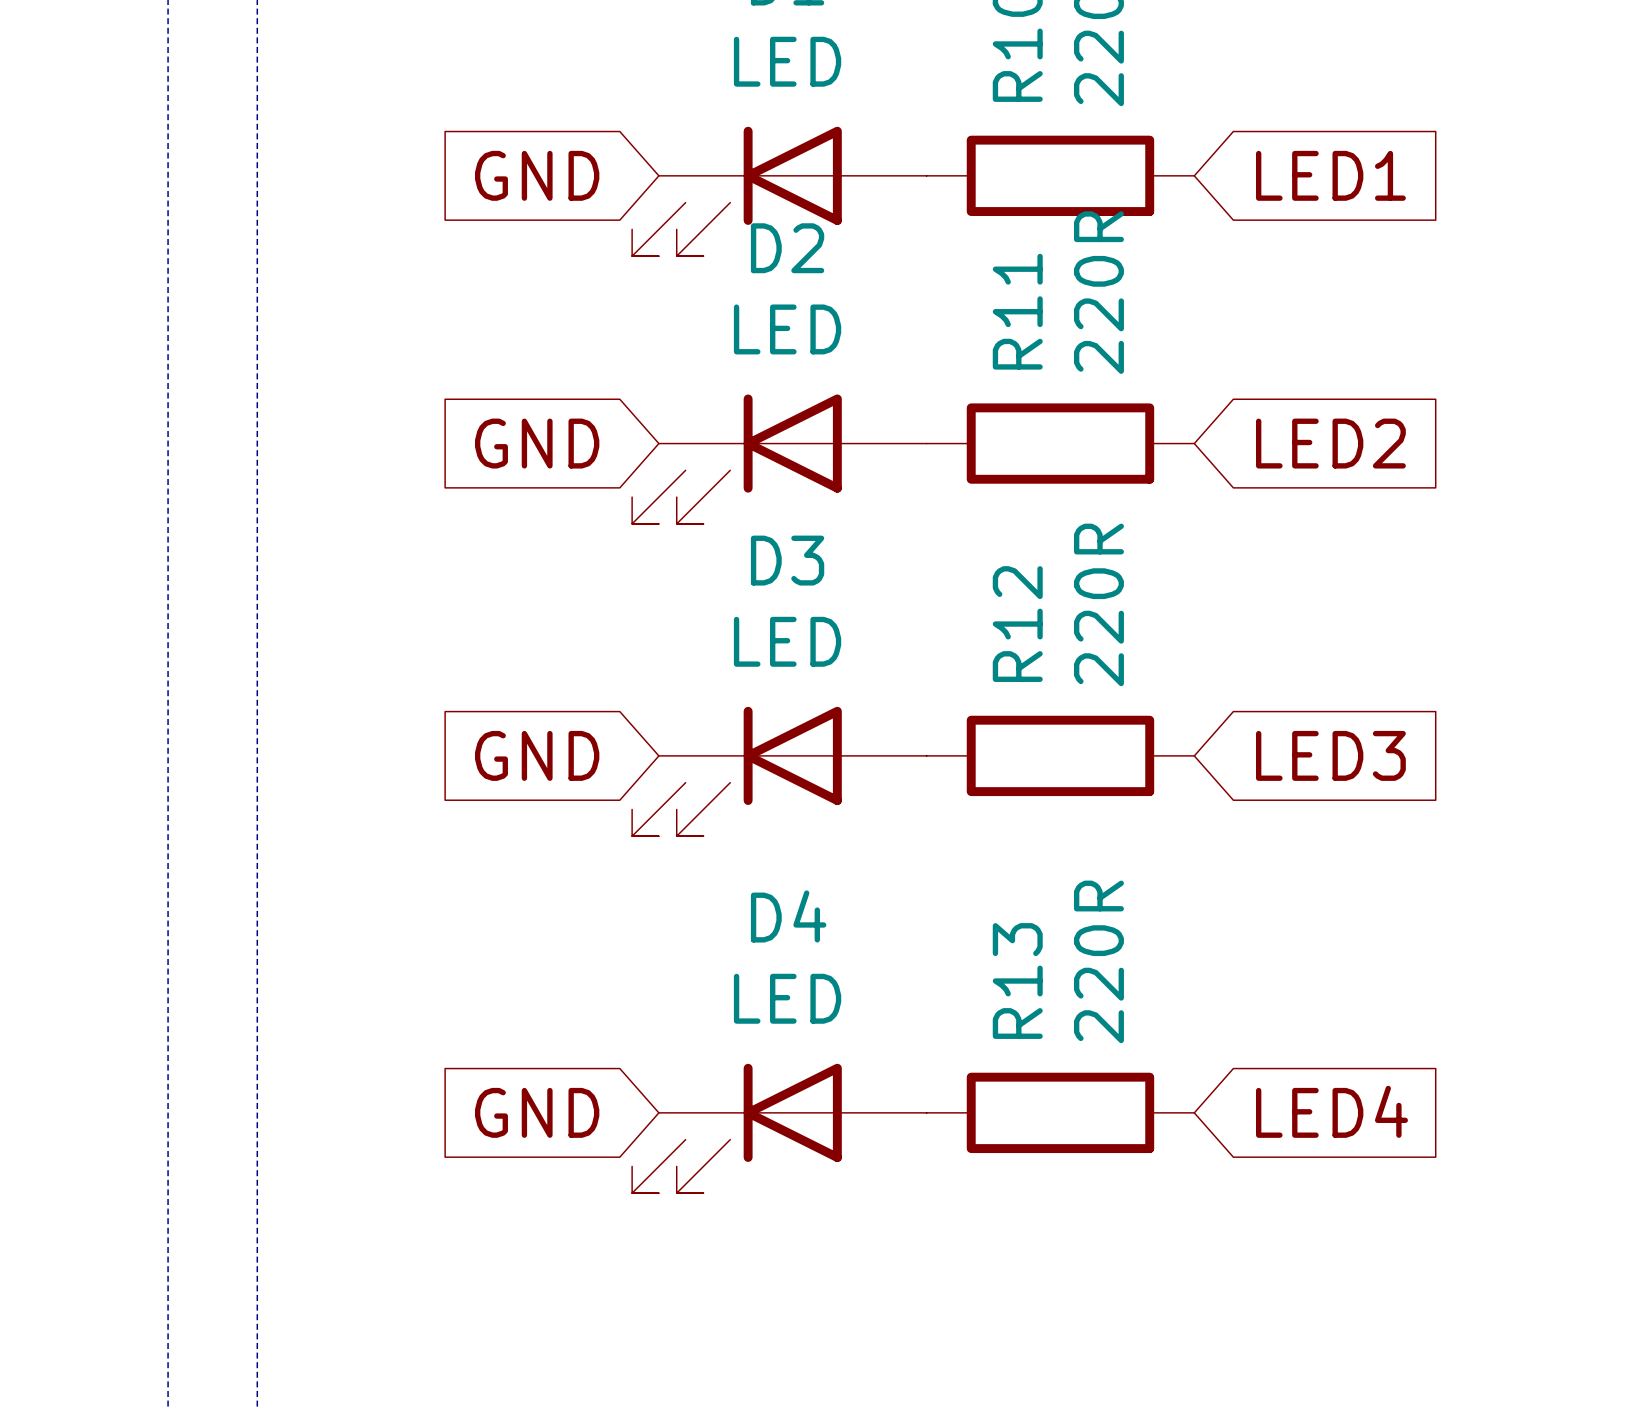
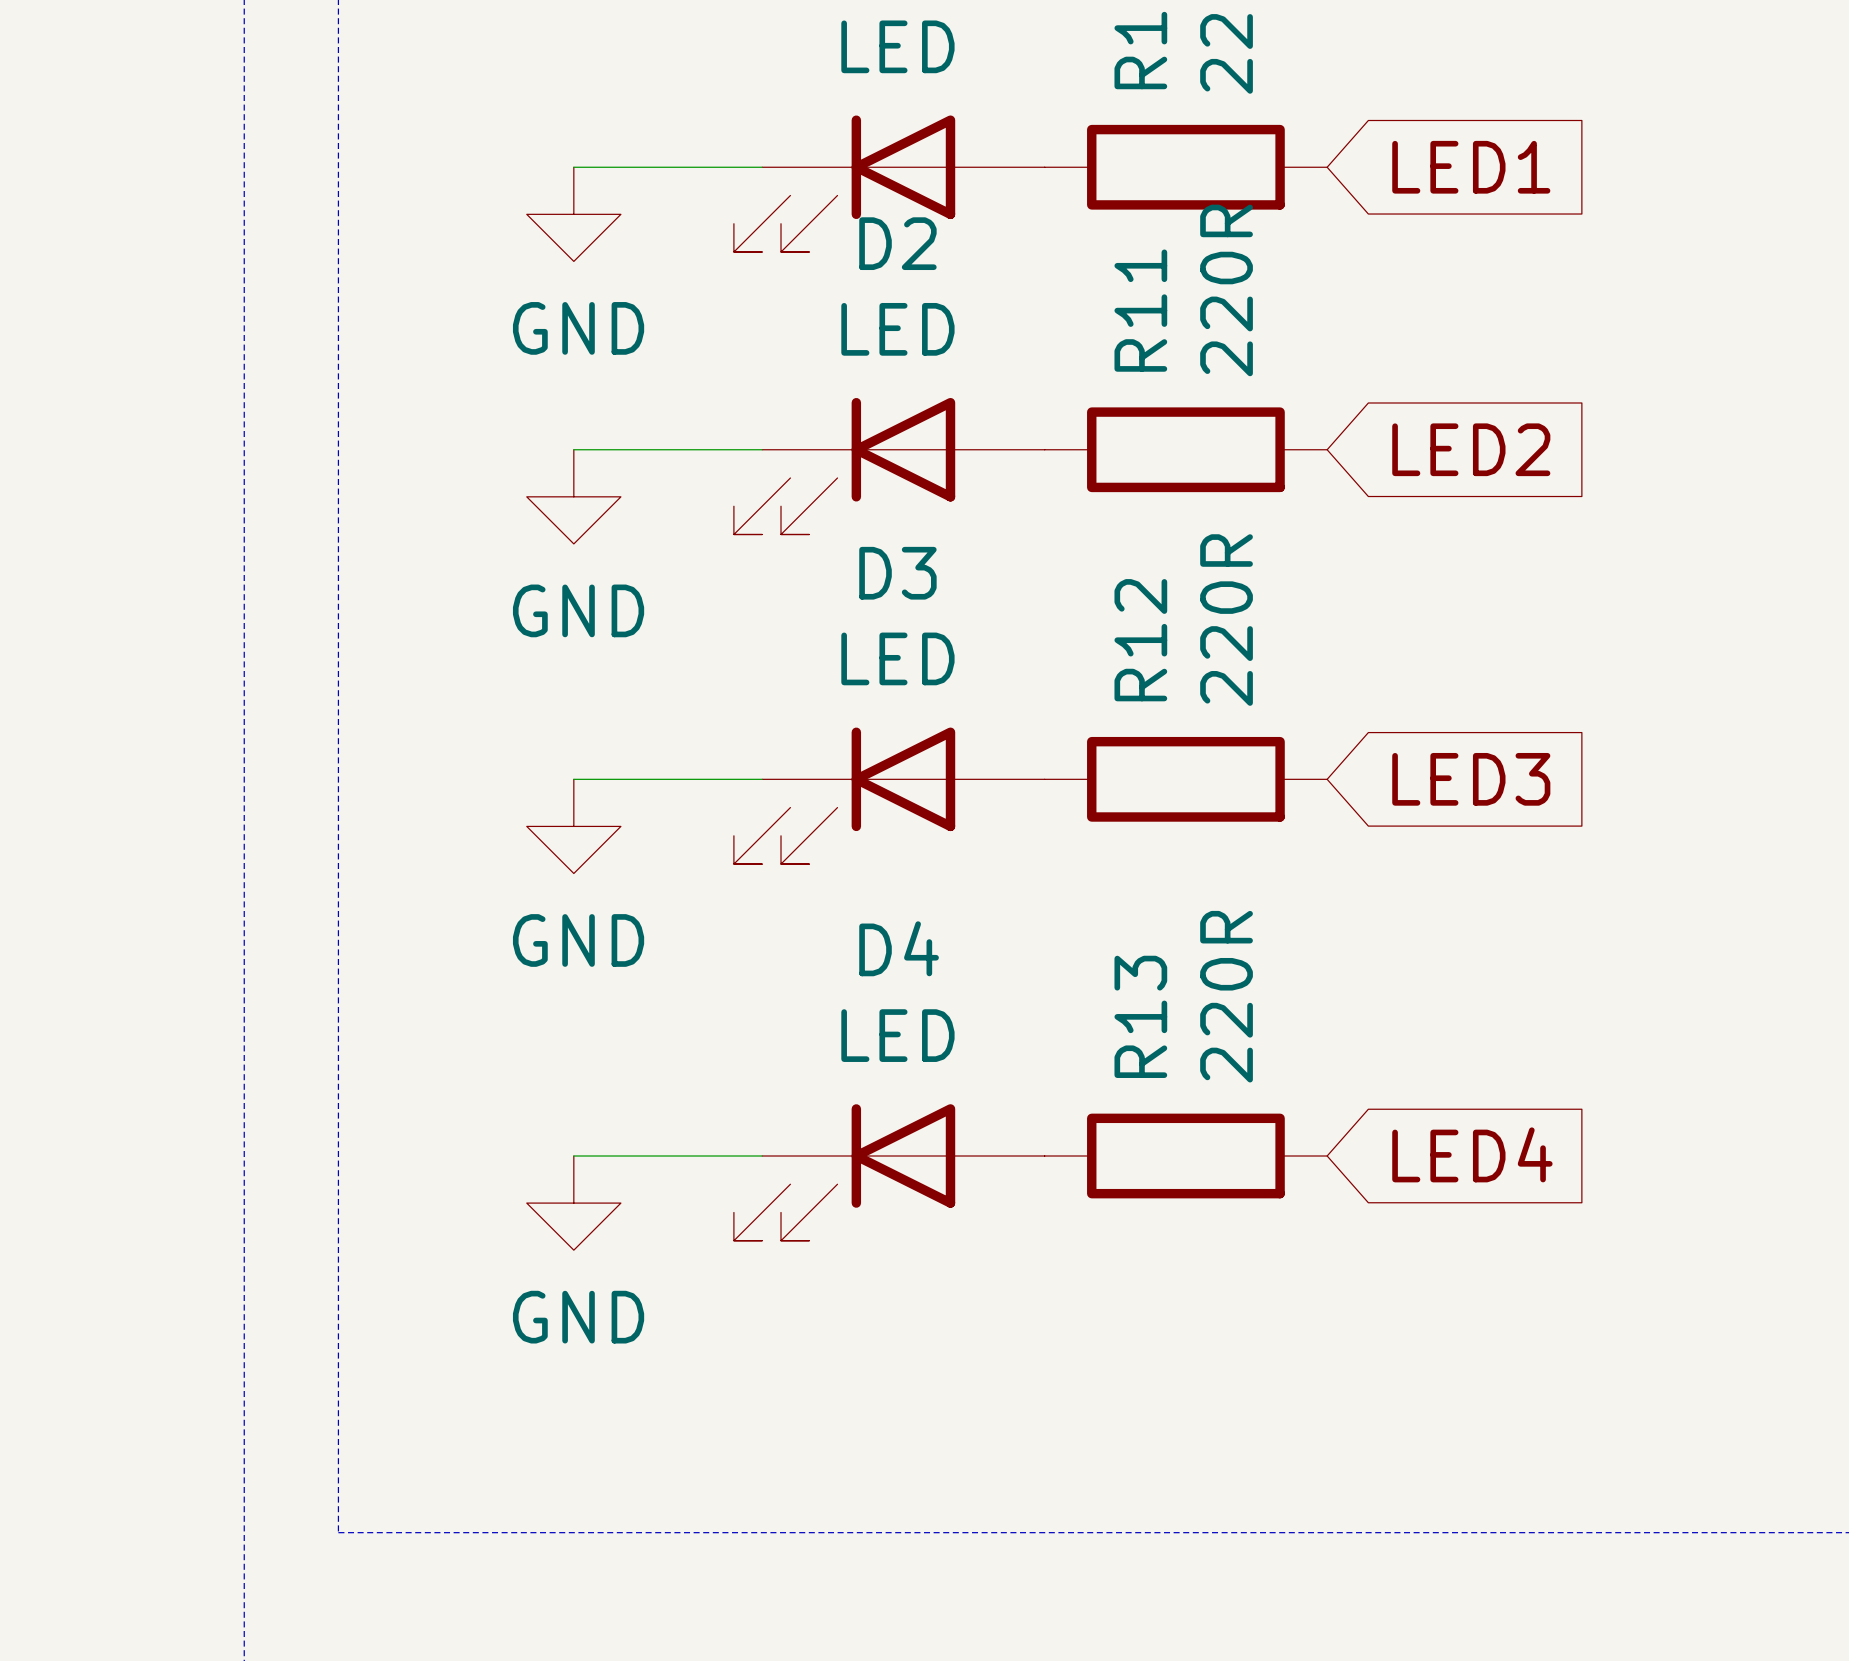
wire: none -> (573, 167) (762, 167)
global label: GND (537, 175) -> none
power symbol: none -> GND (573, 214)
wire: none -> (573, 449) (762, 449)
global label: GND (537, 443) -> none
power symbol: none -> GND (573, 496)
wire: none -> (573, 779) (762, 779)
global label: GND (537, 755) -> none
power symbol: none -> GND (573, 826)
wire: none -> (573, 1156) (762, 1156)
global label: GND (537, 1112) -> none
power symbol: none -> GND (573, 1203)

